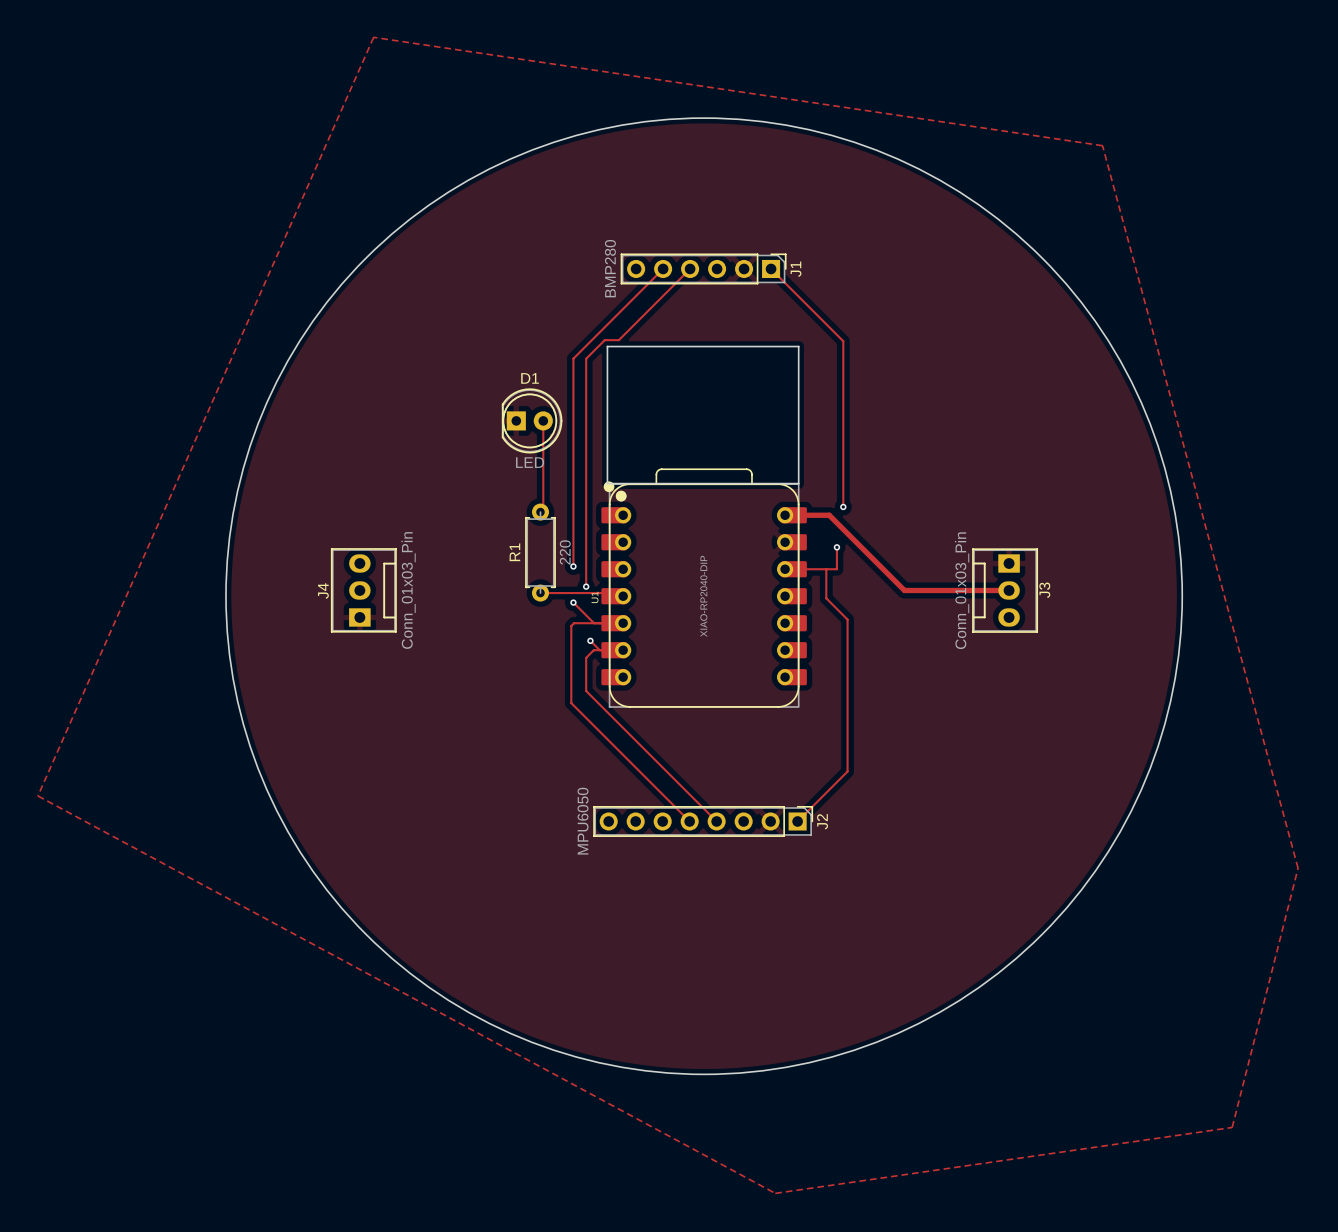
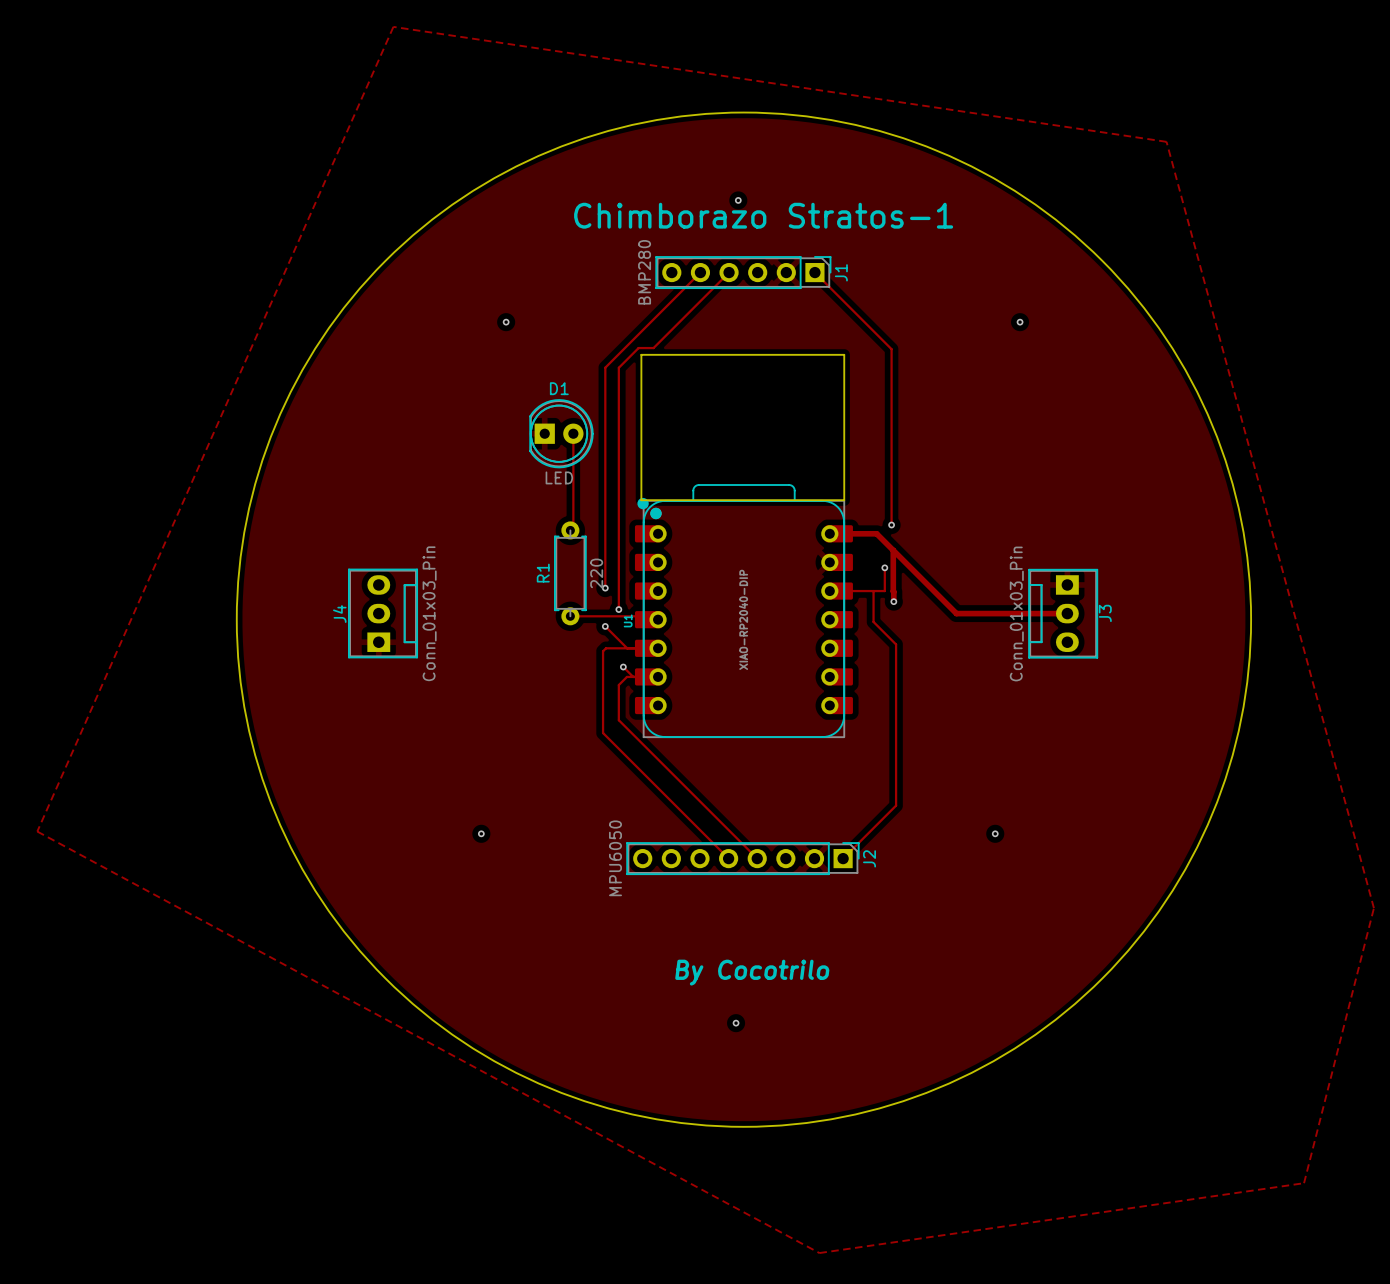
via: none -> (738, 200)
text: none -> Chimborazo Stratos-1 (763, 215)
via: none -> (506, 322)
via: none -> (1020, 322)
track: none -> (893, 550) (893, 601)
via: none -> (893, 601)
via: none -> (481, 833)
via: none -> (995, 833)
text: none -> By Cocotrilo (752, 972)
via: none -> (736, 1023)

